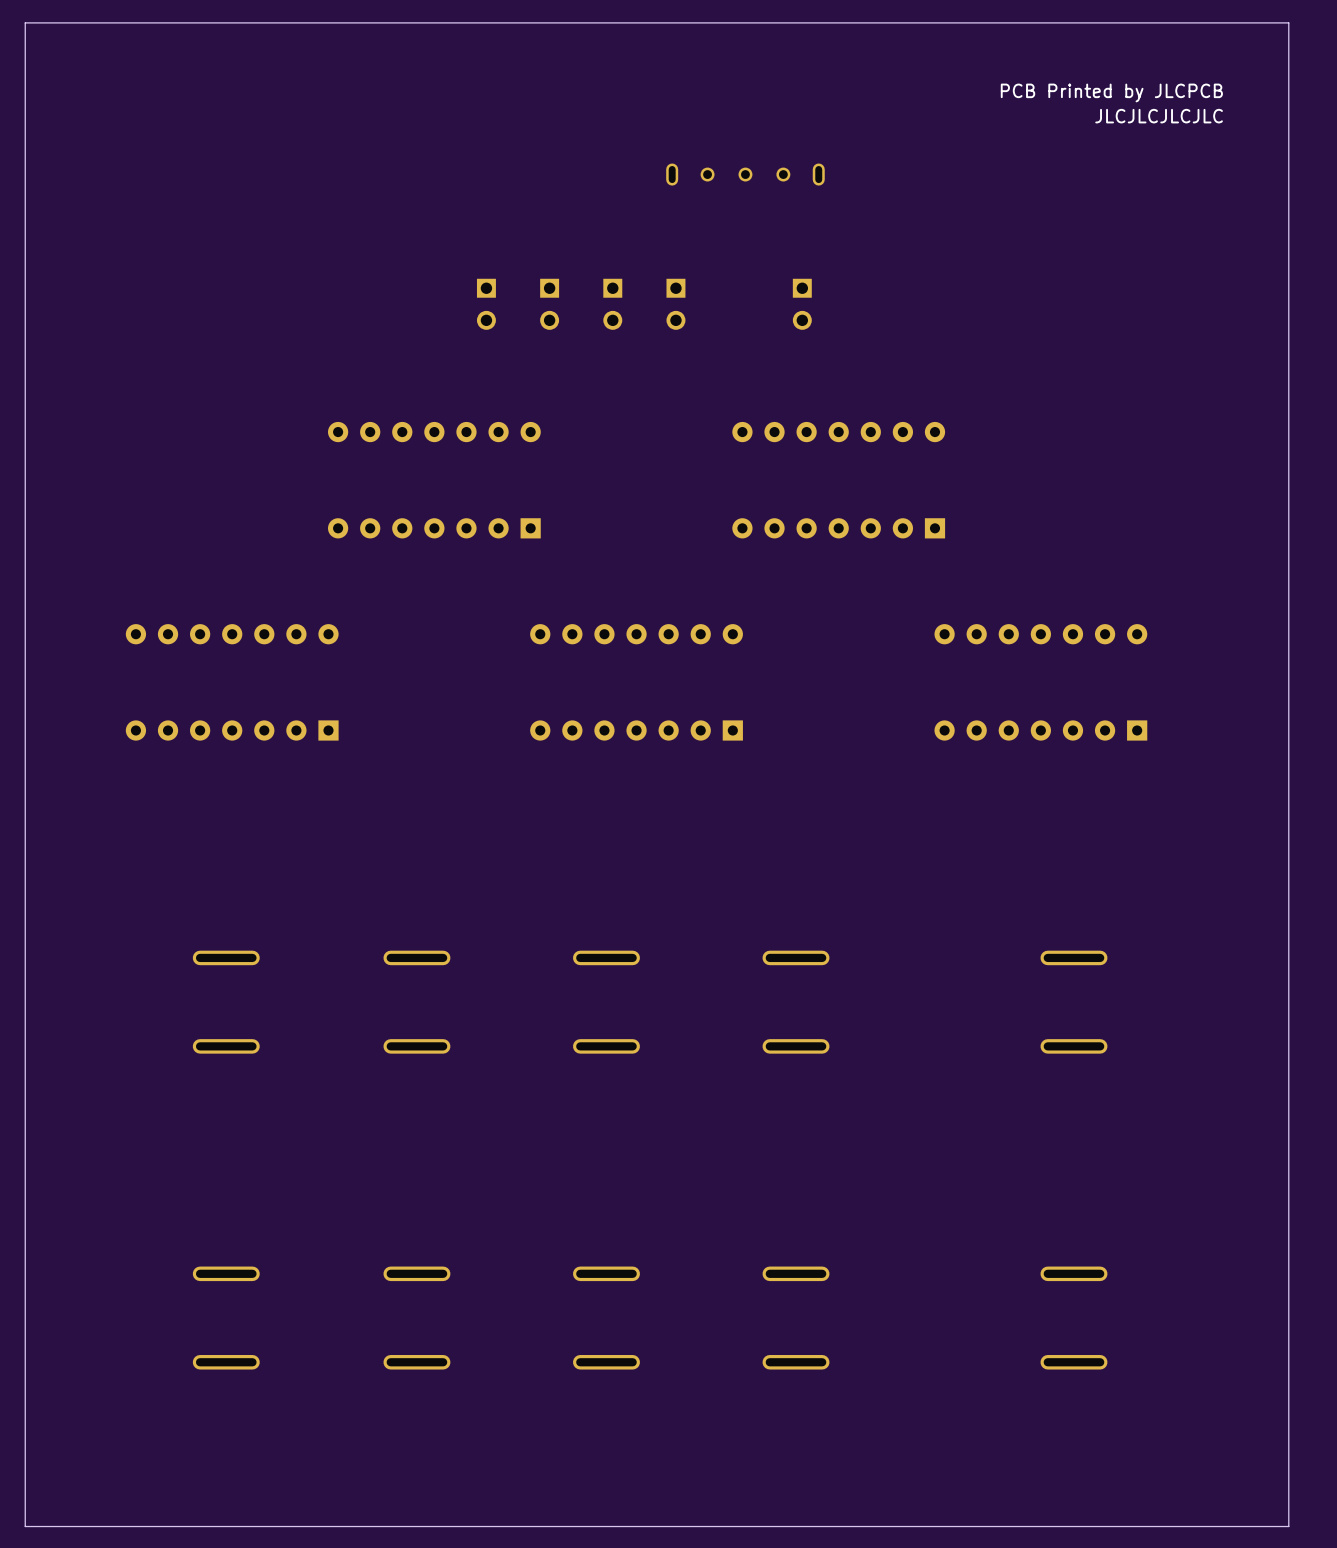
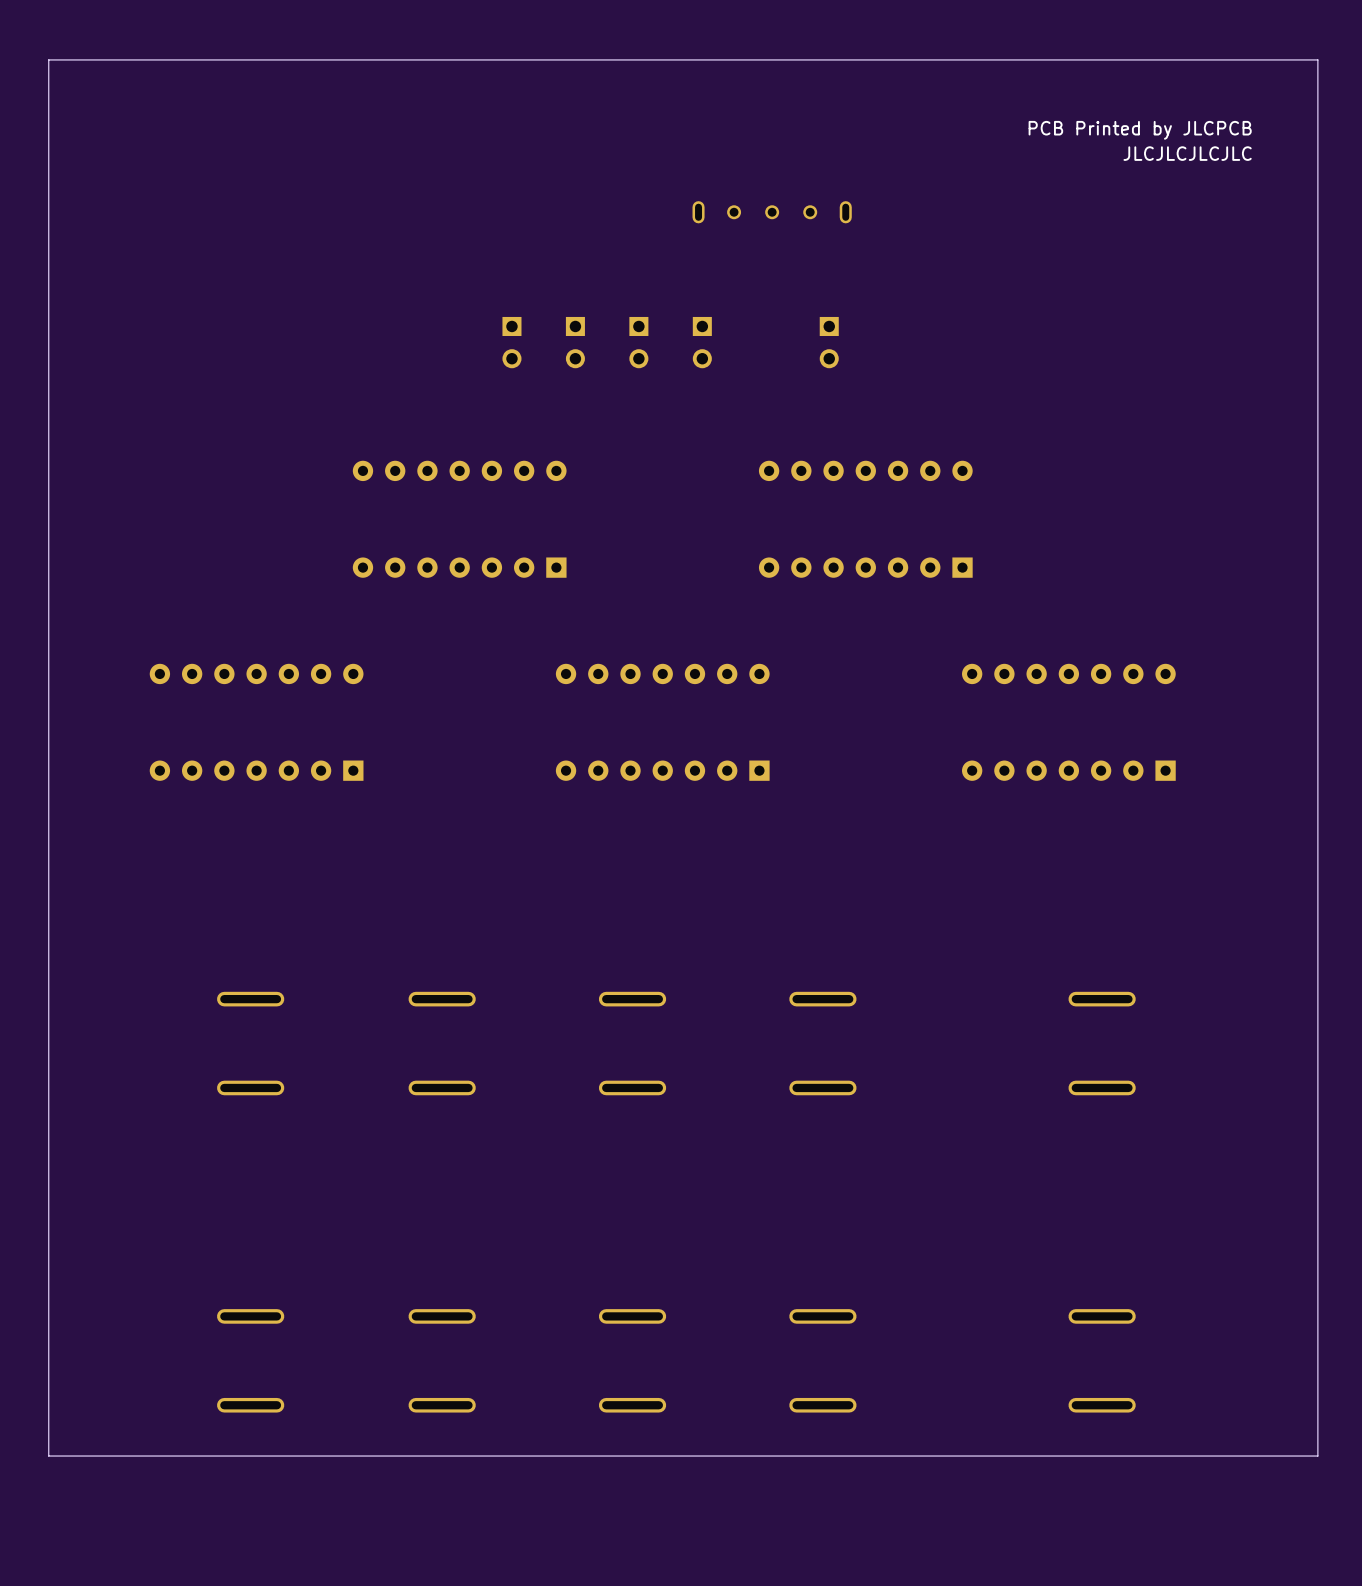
board edge: (1288, 1412) (1288, 1526) (25, 1526) (25, 1412) -> (1317, 1456) (48, 1456)

